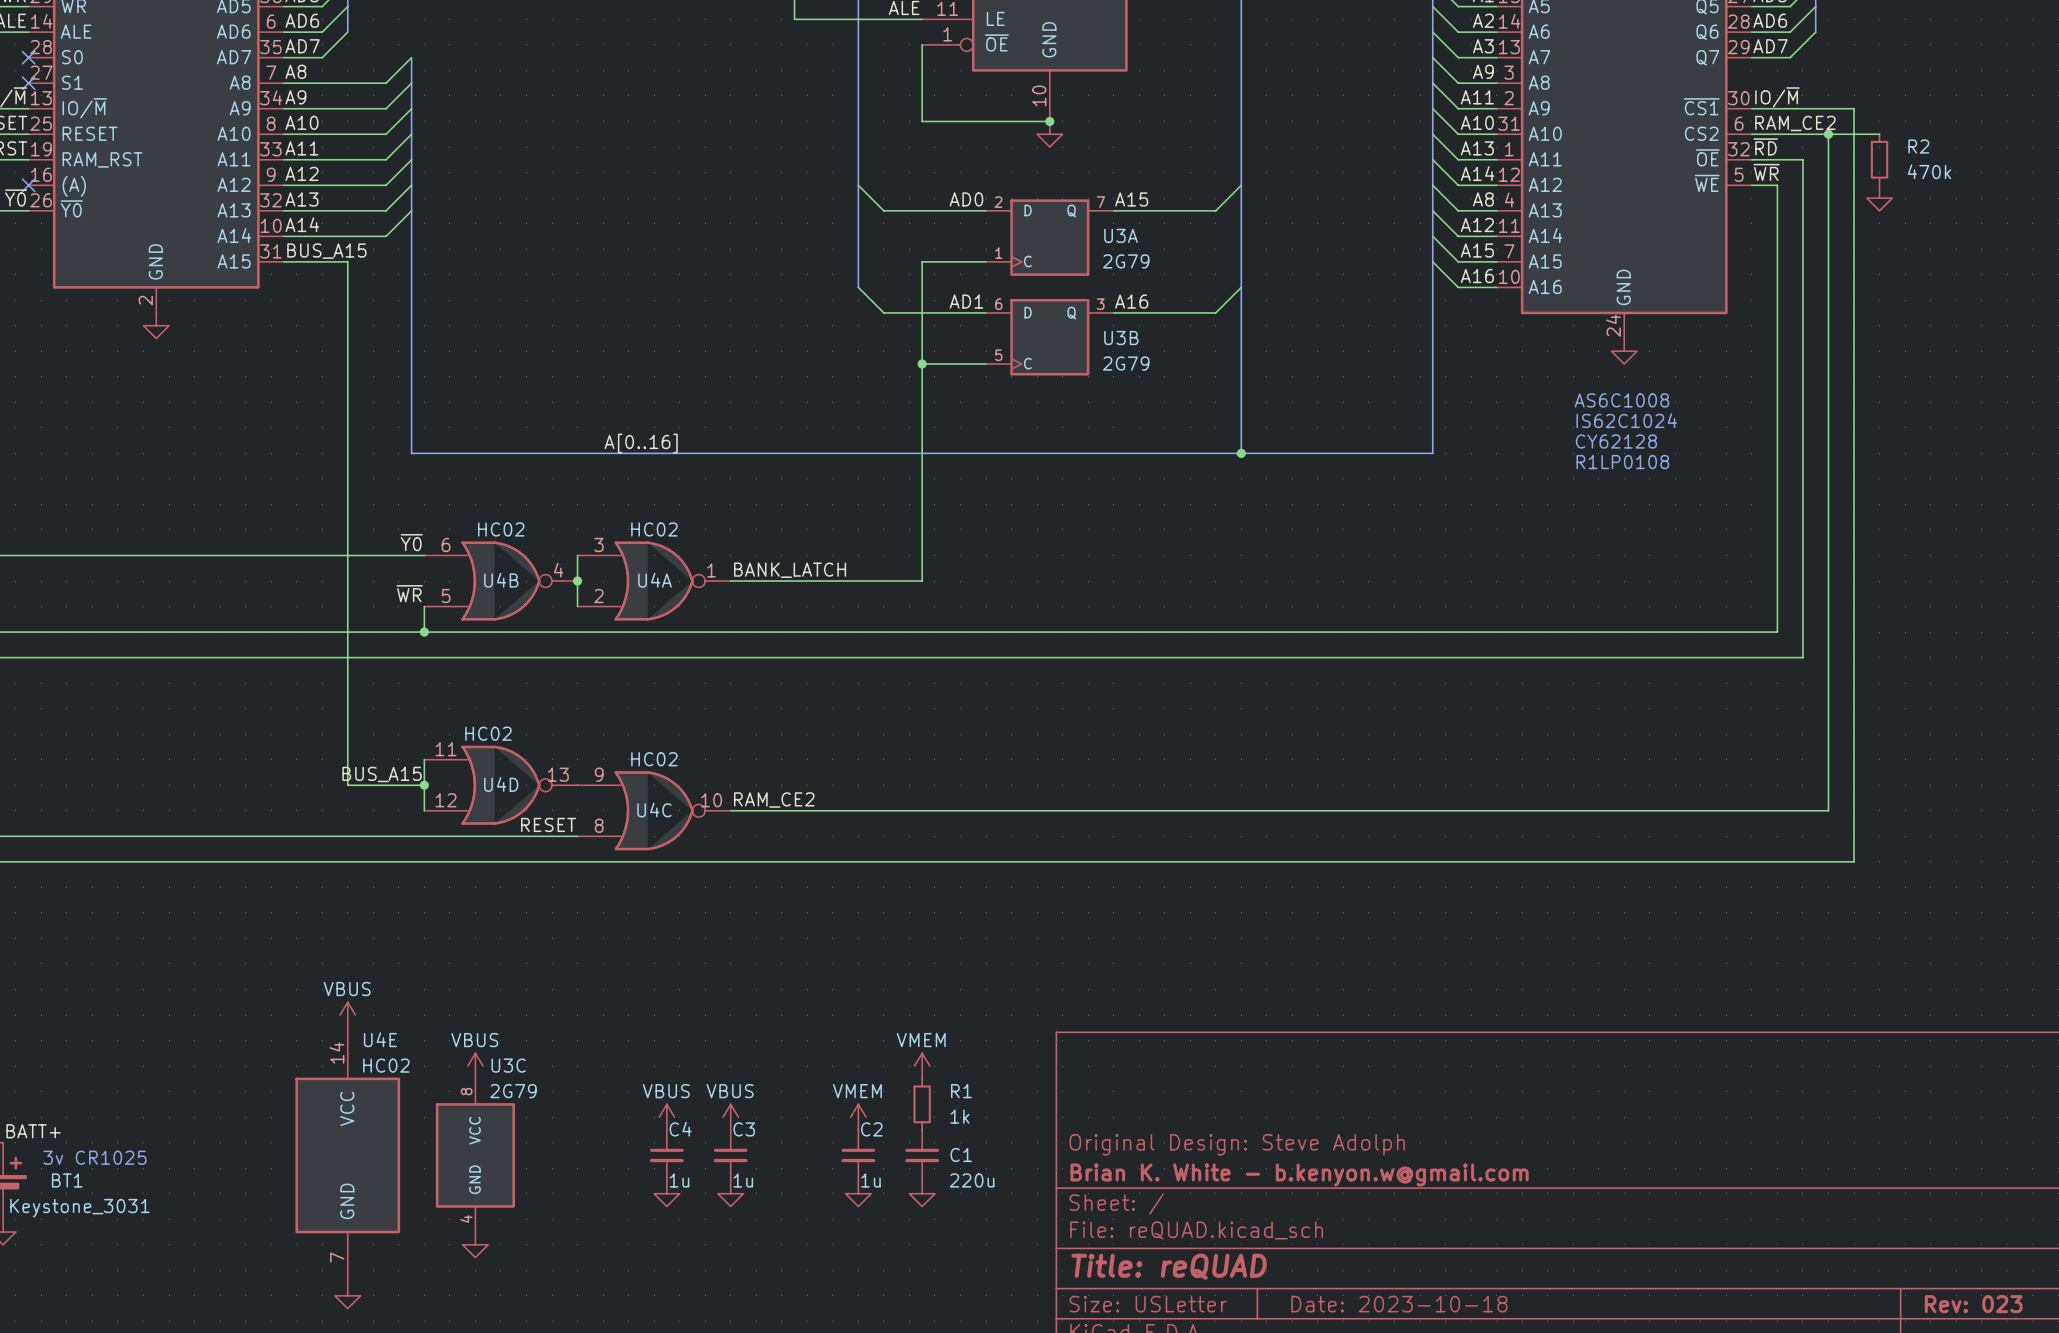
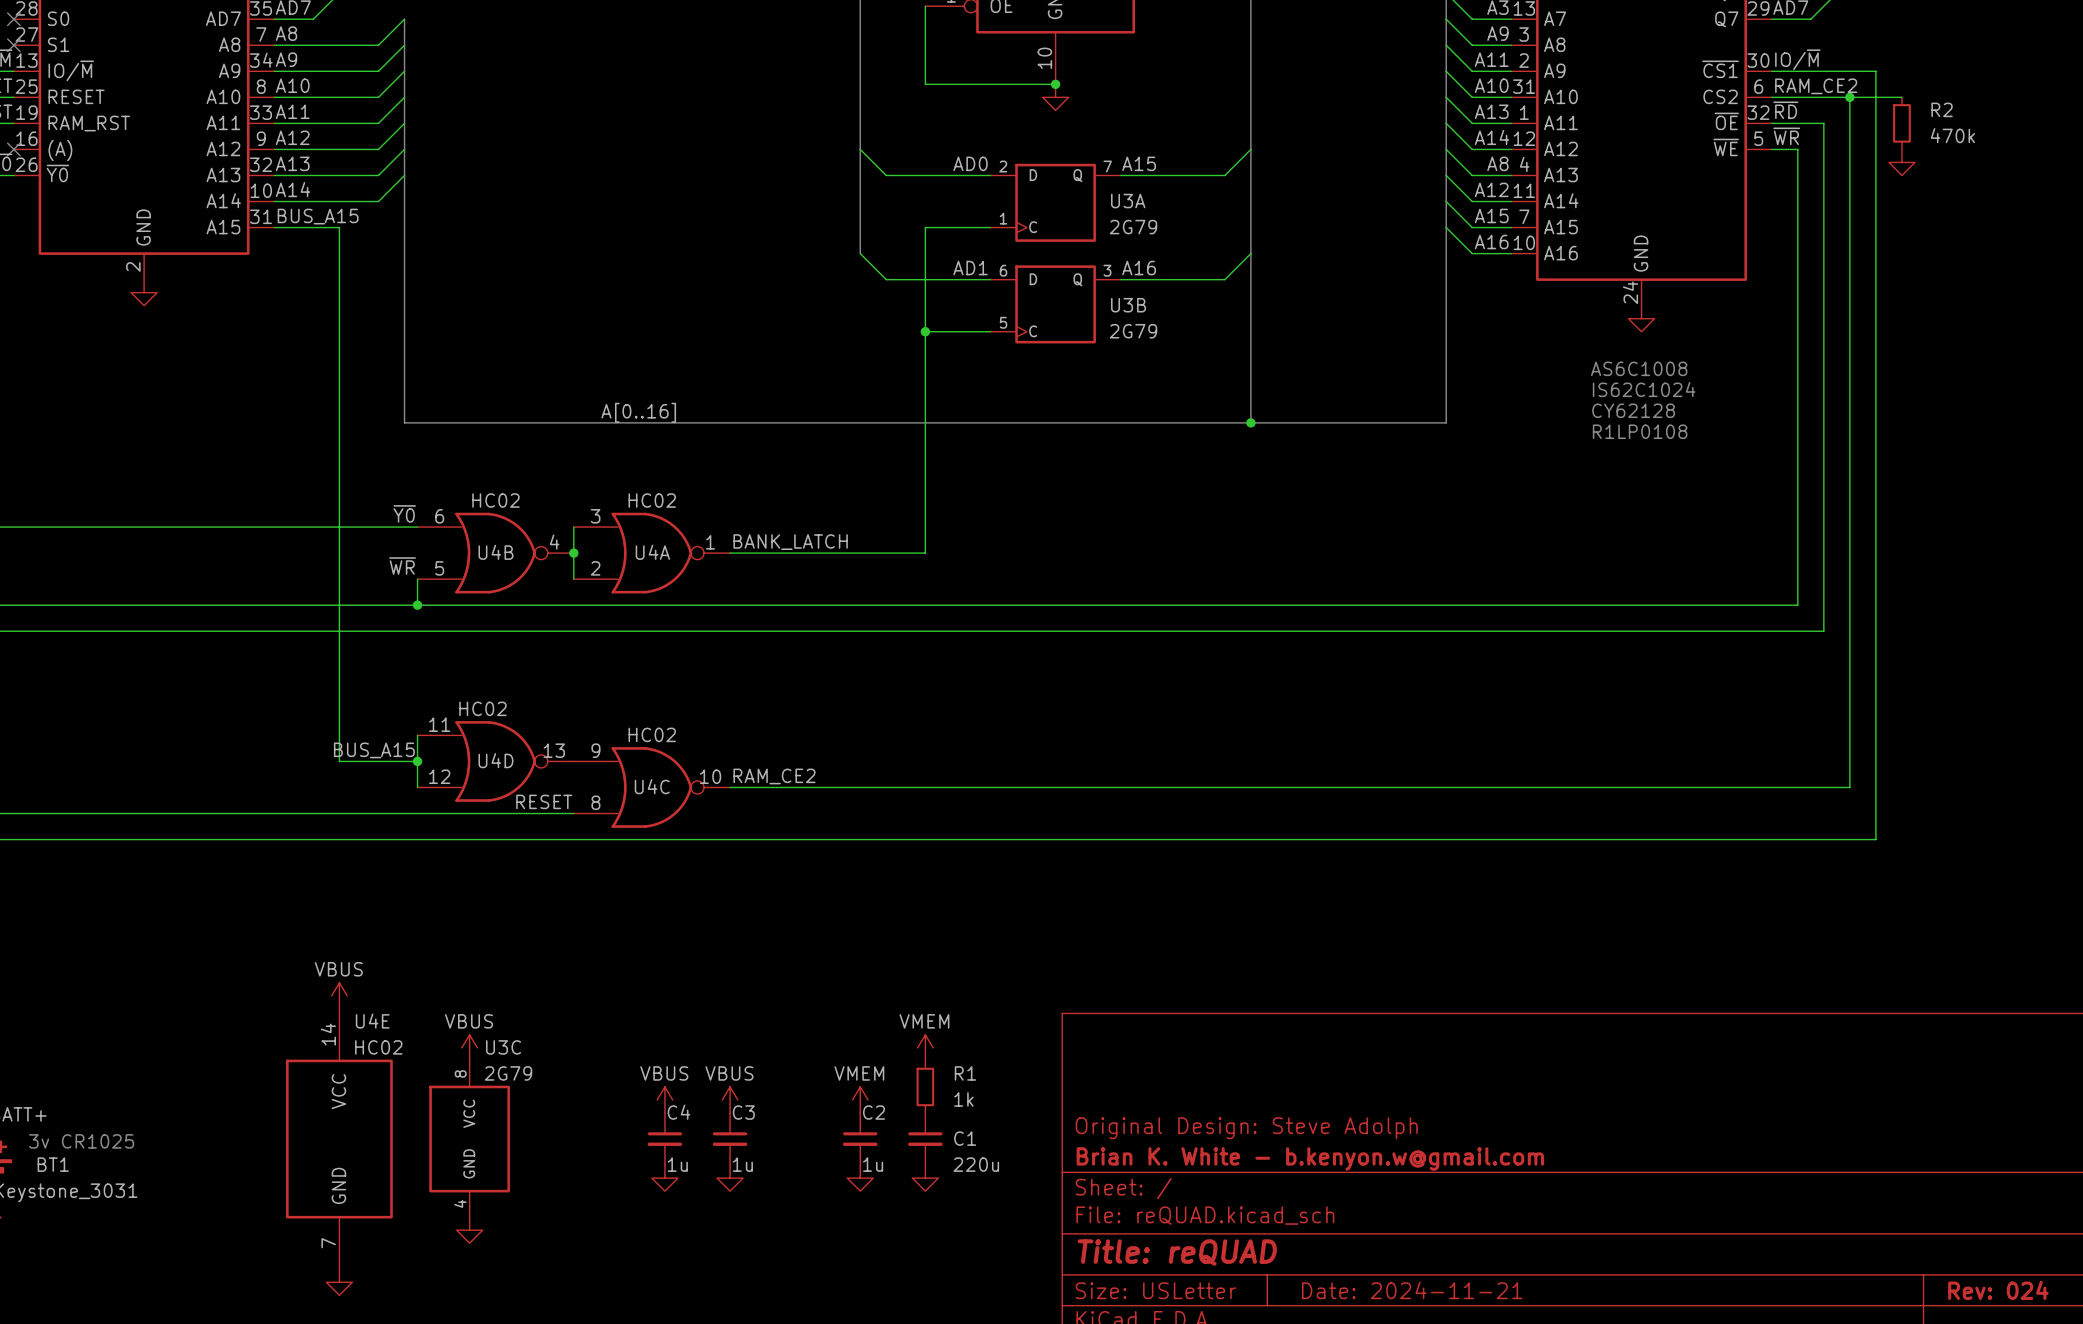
title block: Date: 2023-10-18 (1399, 1304) -> Date: 2024-11-21 (1412, 1290)
title block: Rev: 023 (1973, 1304) -> Rev: 024 (1998, 1290)

